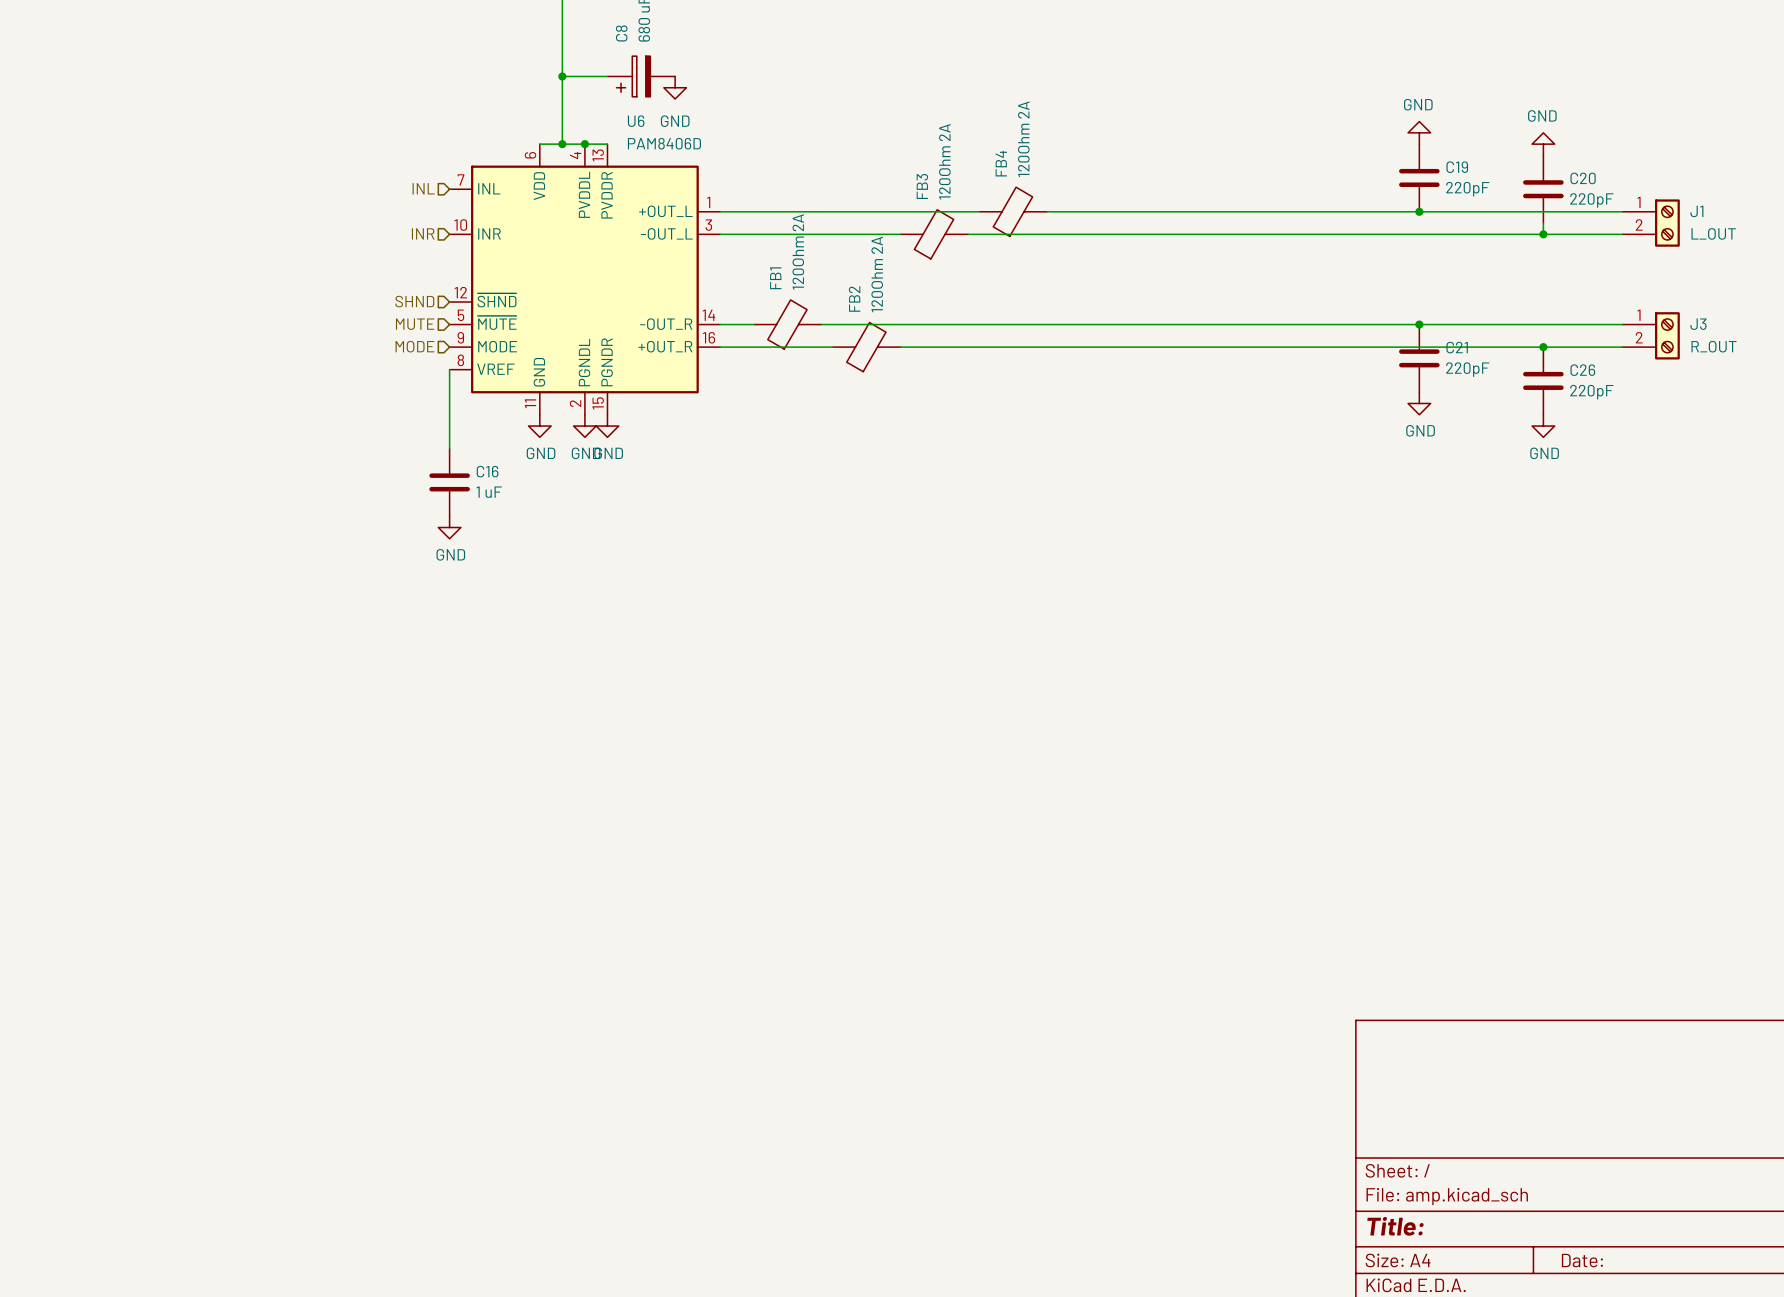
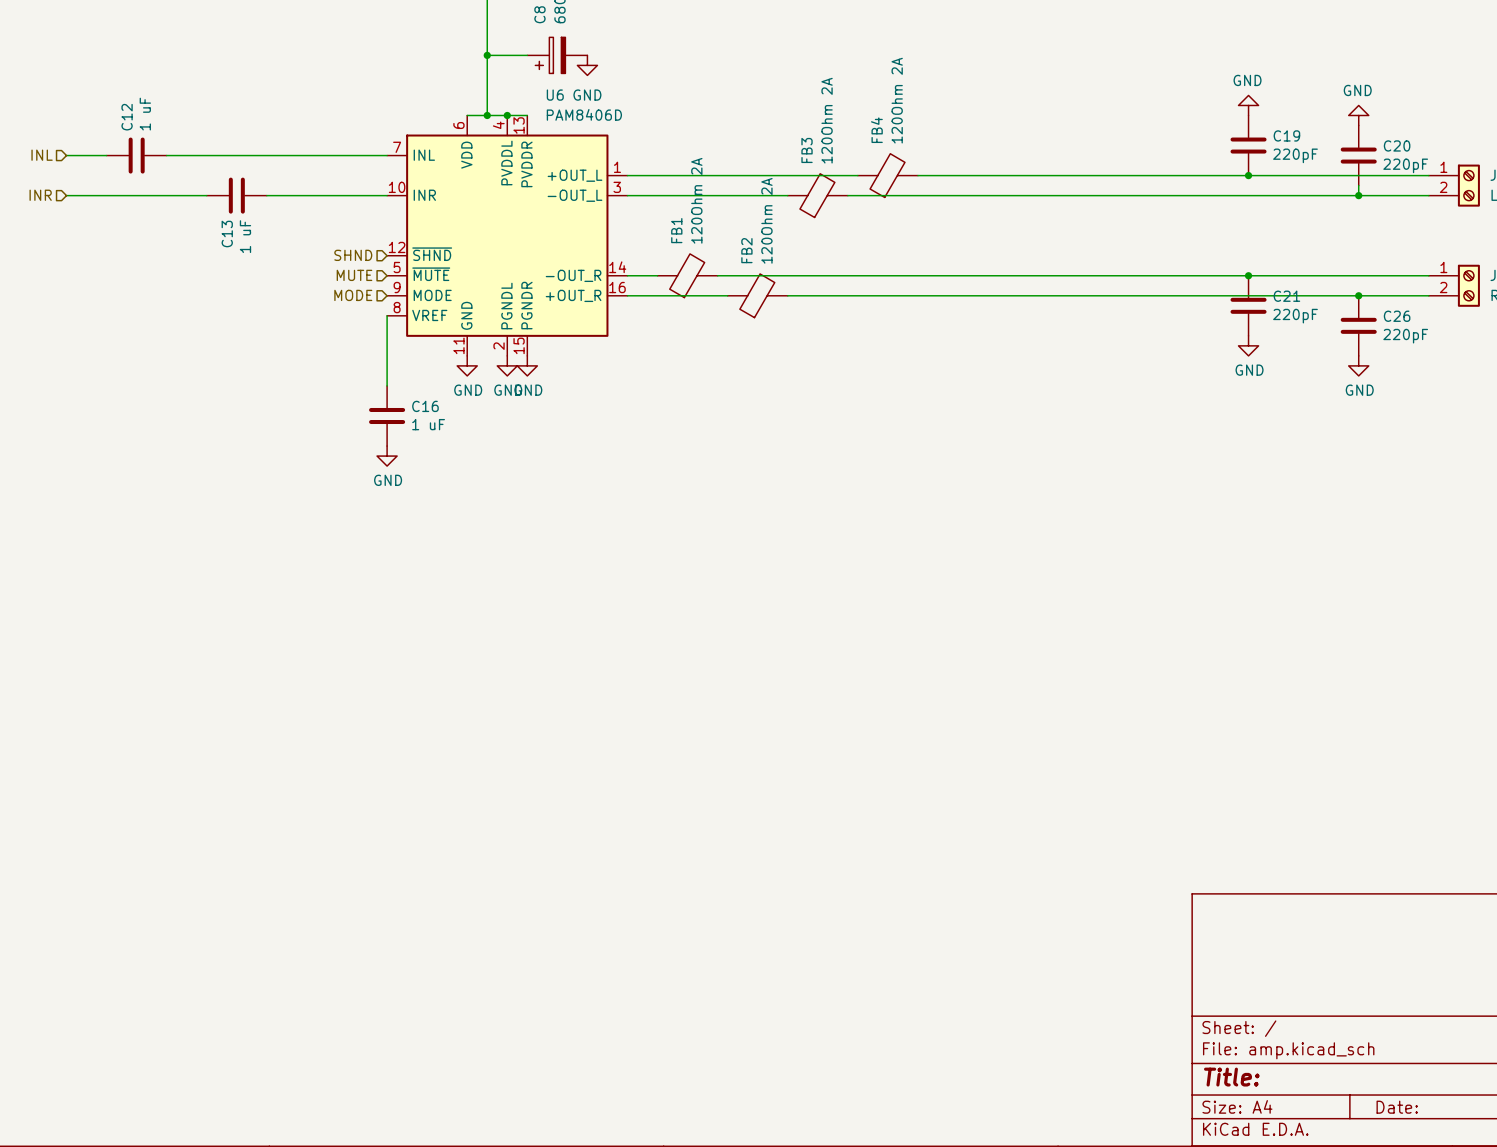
hierarchical label: none -> INL (42, 155)
hierarchical label: INL (423, 188) -> none
wire: none -> (66, 155) (106, 155)
C12: none -> 1 uF (136, 155)
wire: none -> (166, 155) (387, 155)
hierarchical label: none -> INR (40, 195)
hierarchical label: INR (423, 233) -> none
wire: none -> (66, 195) (206, 195)
C13: none -> 1 uF (236, 195)
wire: none -> (266, 195) (387, 195)

